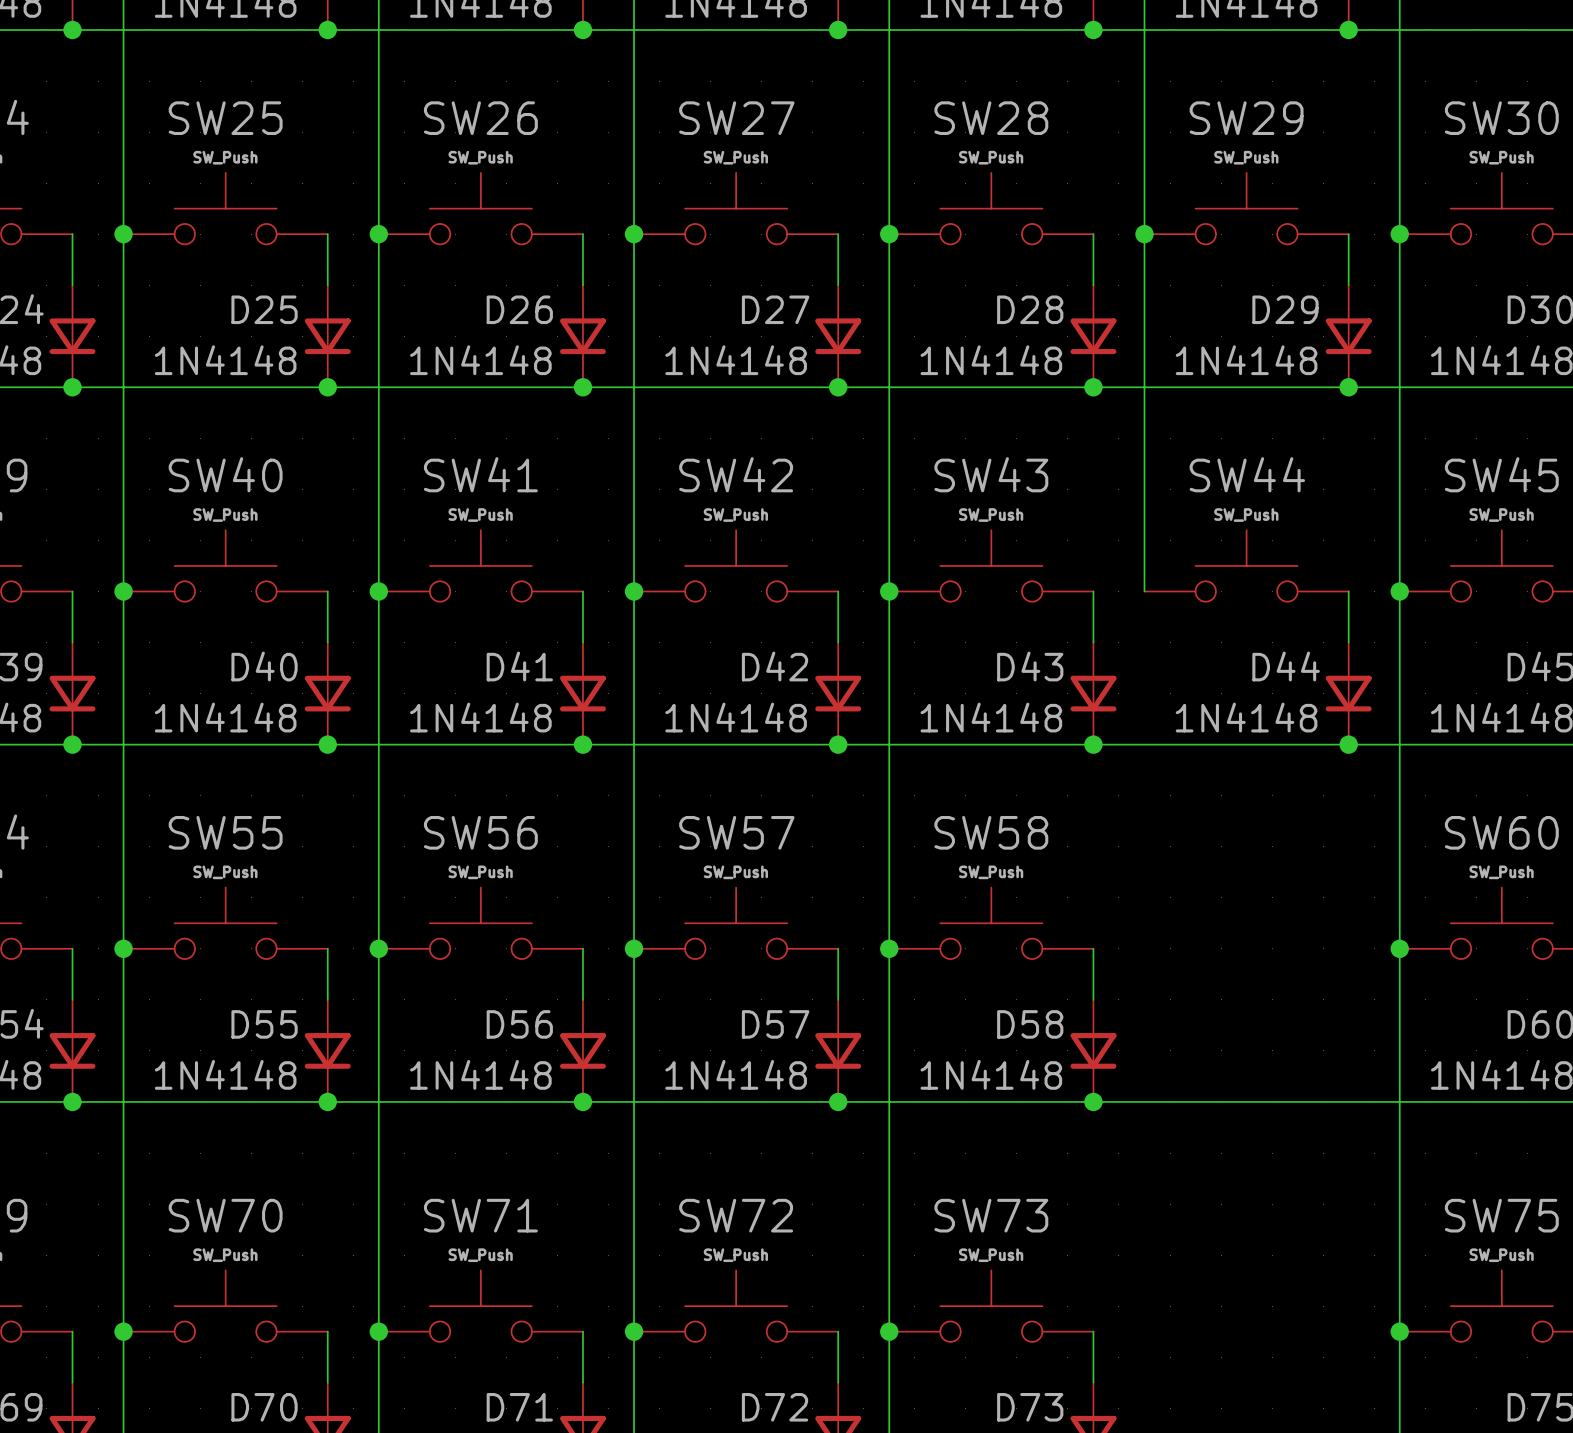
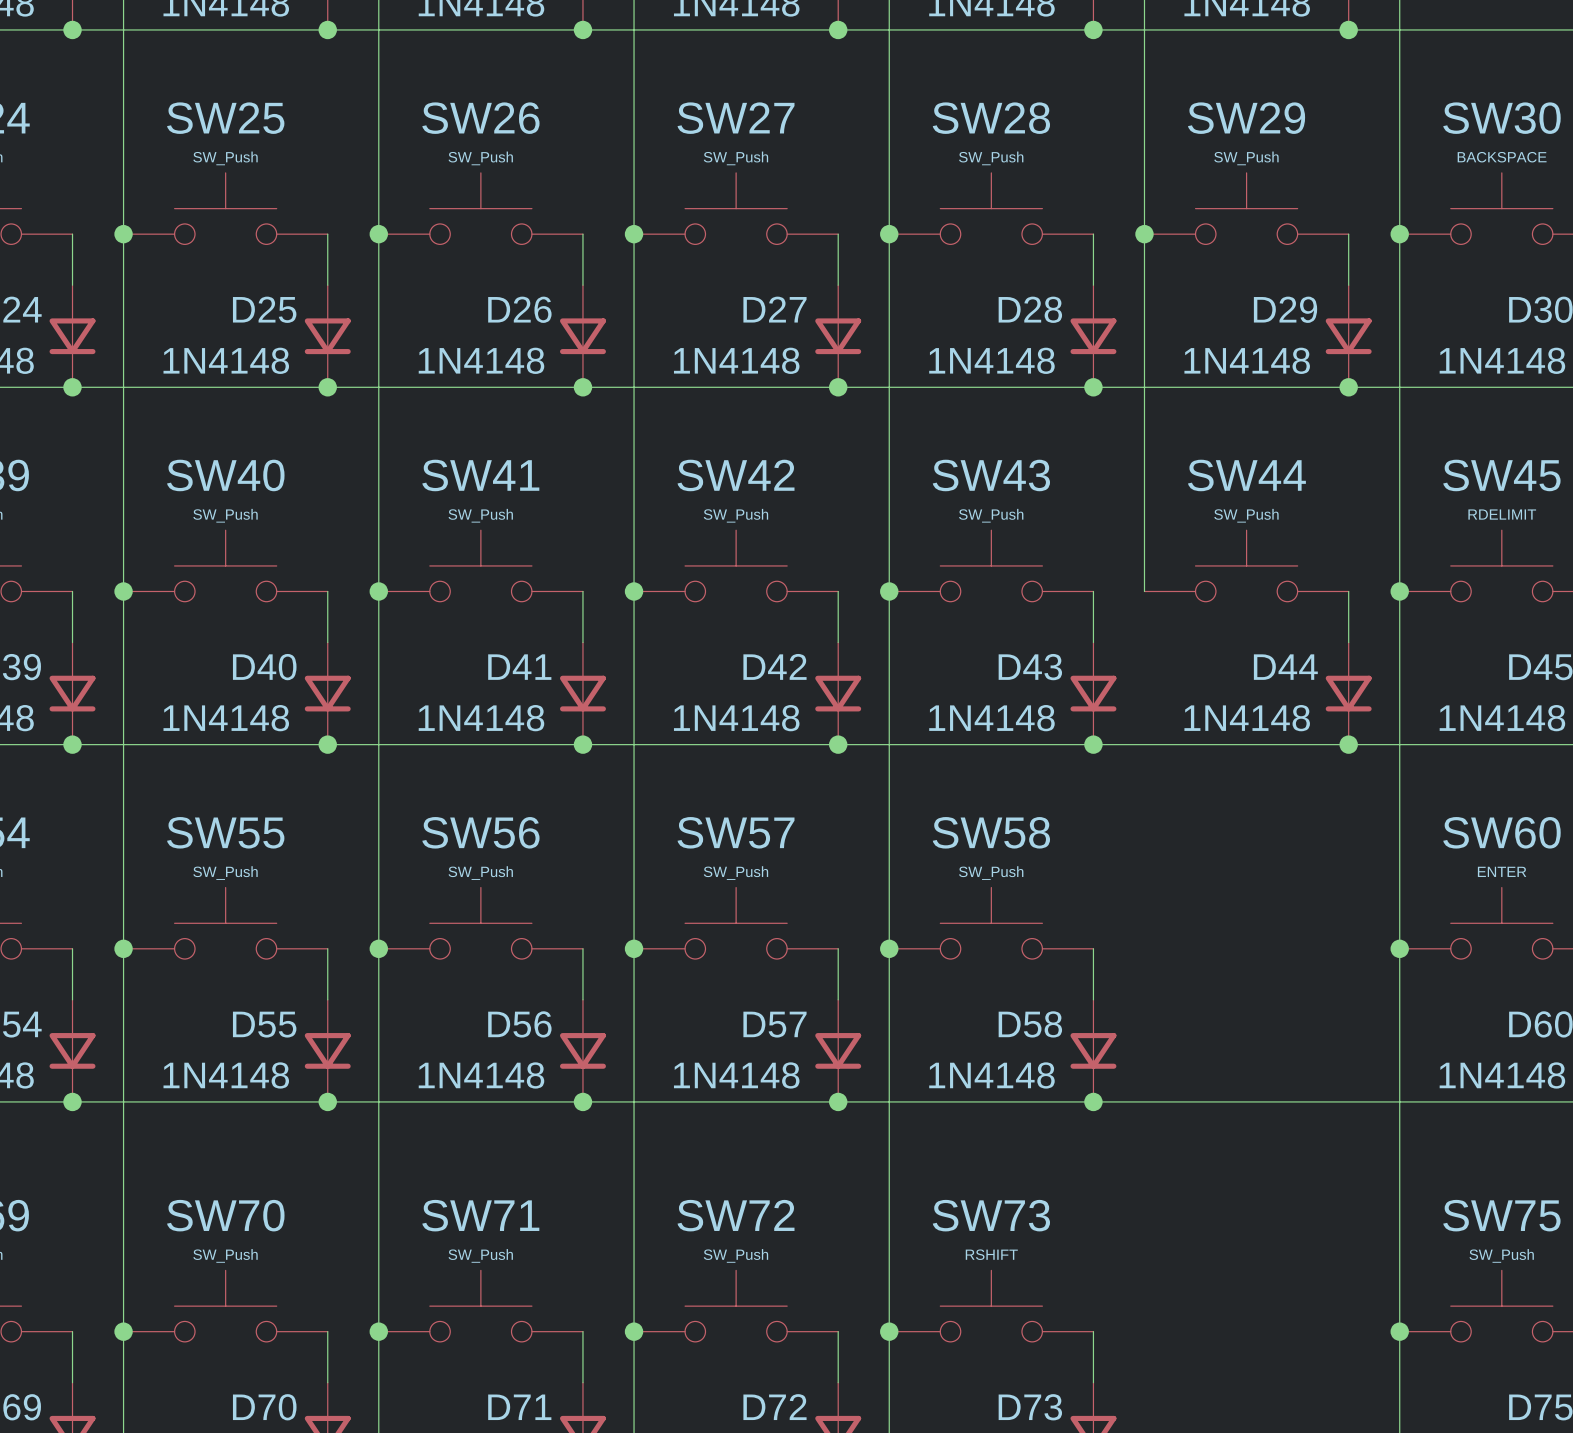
SW30 value: SW_Push (1501, 157) -> BACKSPACE (1502, 157)
SW45 value: SW_Push (1501, 515) -> RDELIMIT (1502, 514)
SW60 value: SW_Push (1501, 872) -> ENTER (1502, 871)
SW73 value: SW_Push (991, 1255) -> RSHIFT (991, 1254)

